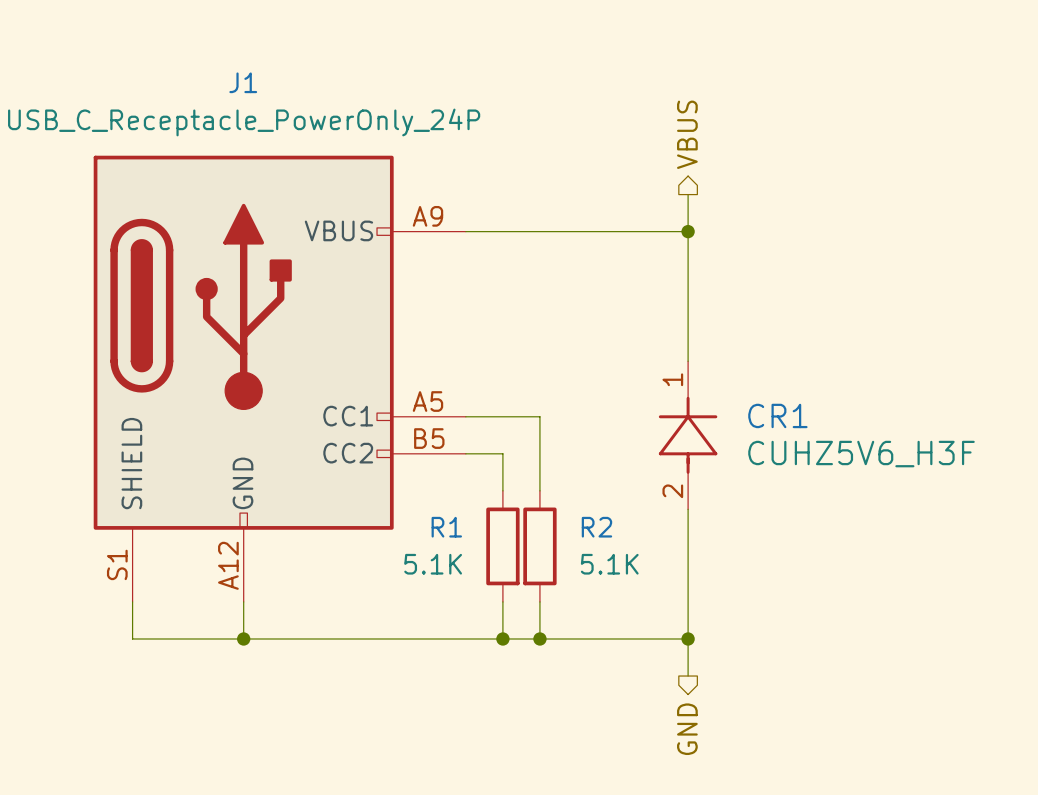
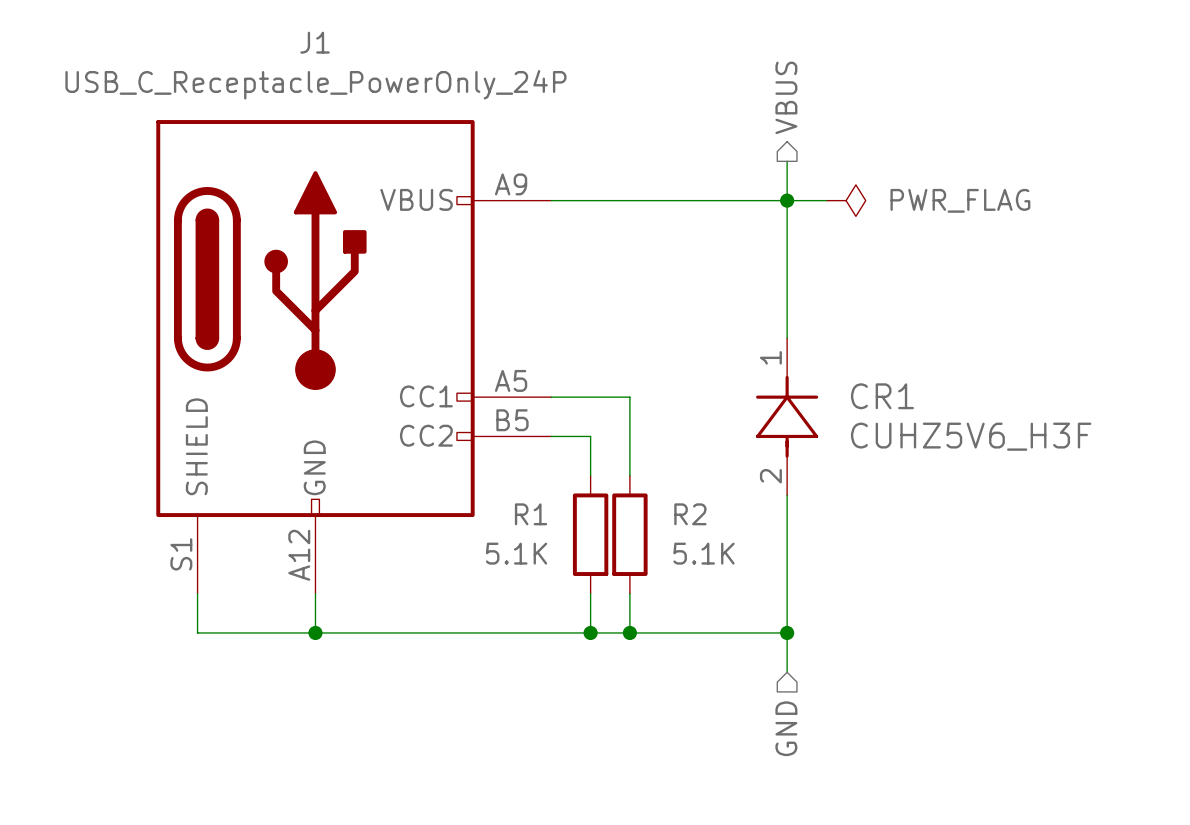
wire: none -> (787, 200) (826, 200)
power symbol: none -> PWR_FLAG (846, 200)
hierarchical label shape: output (687, 729) -> input (786, 728)

